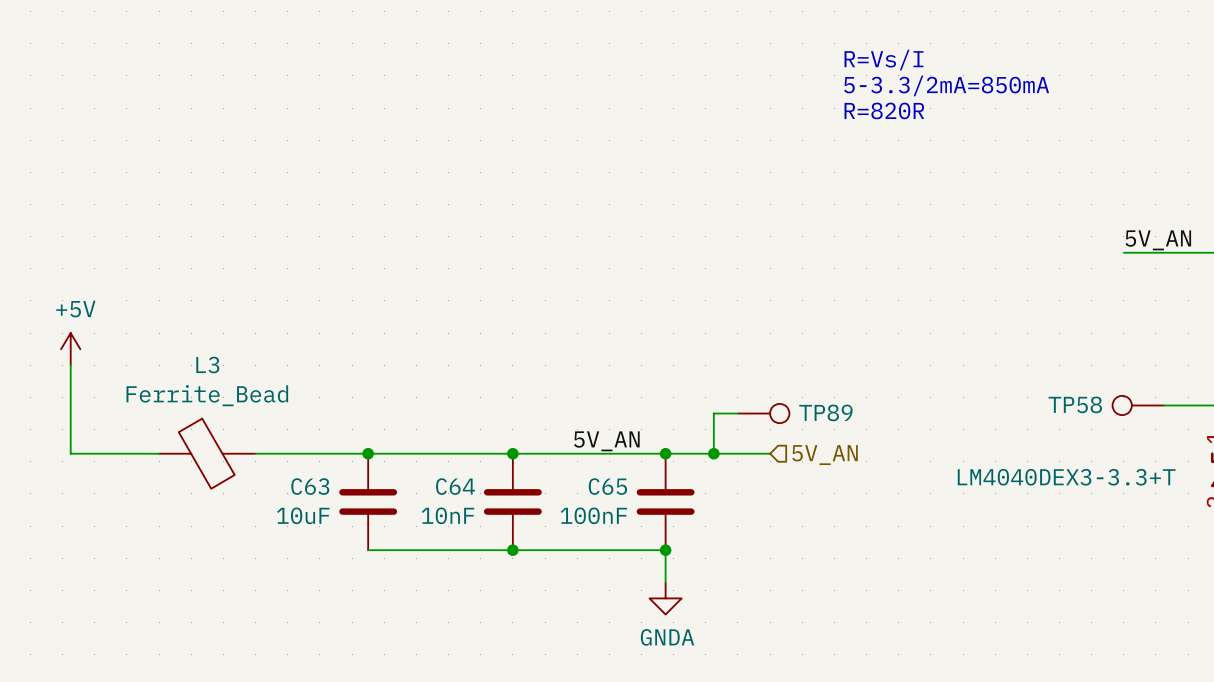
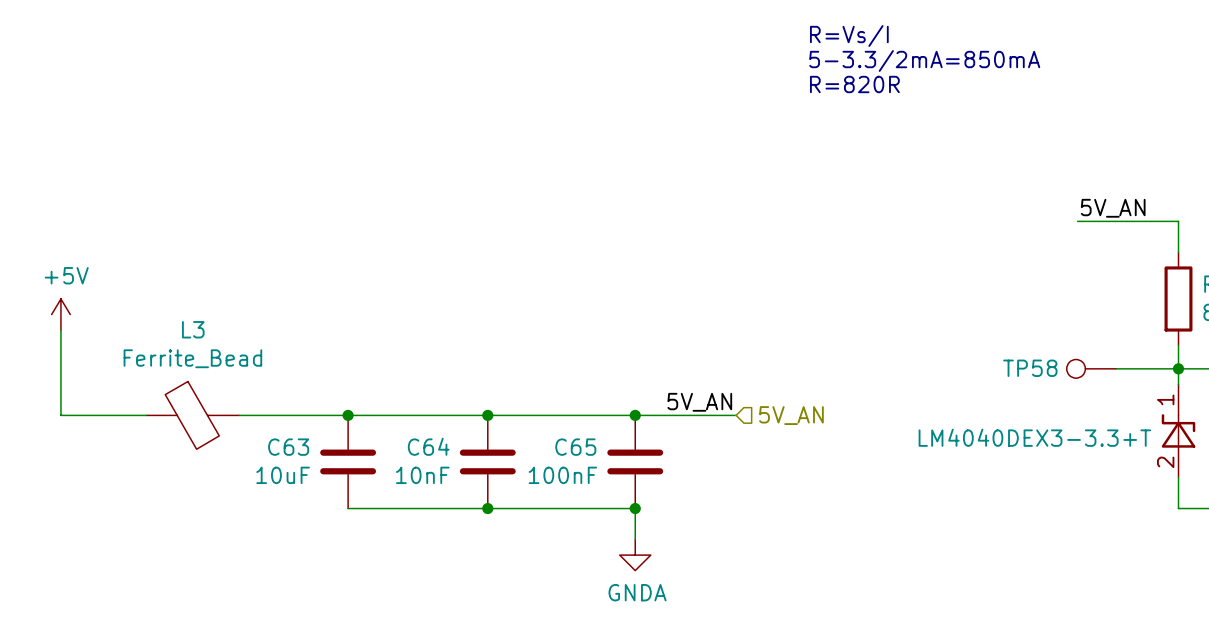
wire: (737, 413) (713, 413) (713, 453) -> none
TP89: (763, 413) -> none
label position: 5V_AN (606, 441) -> 5V_AN (699, 402)
junction: (713, 453) -> none

